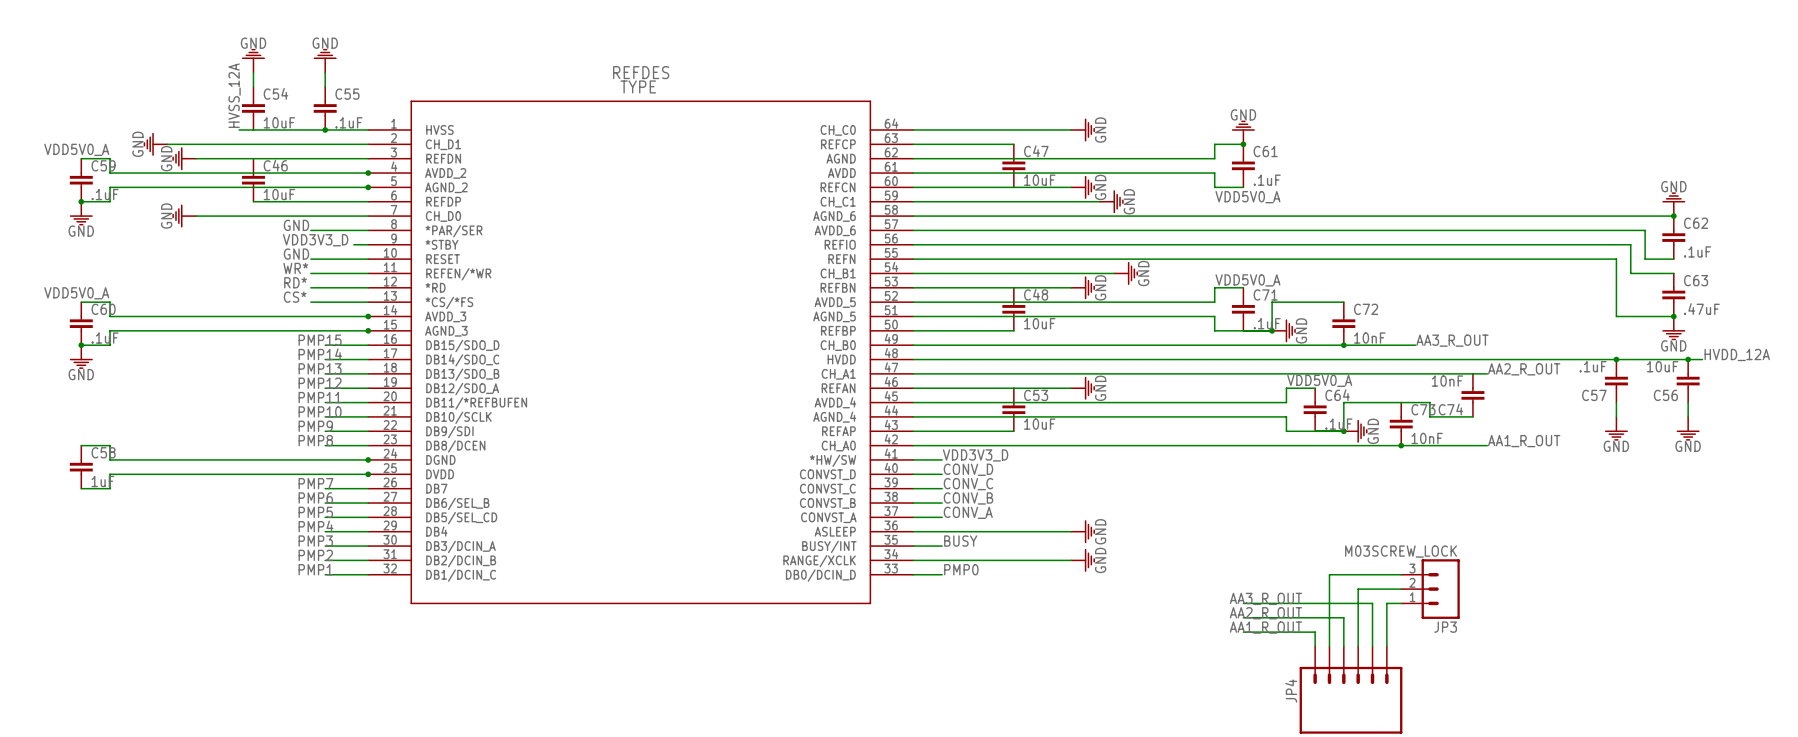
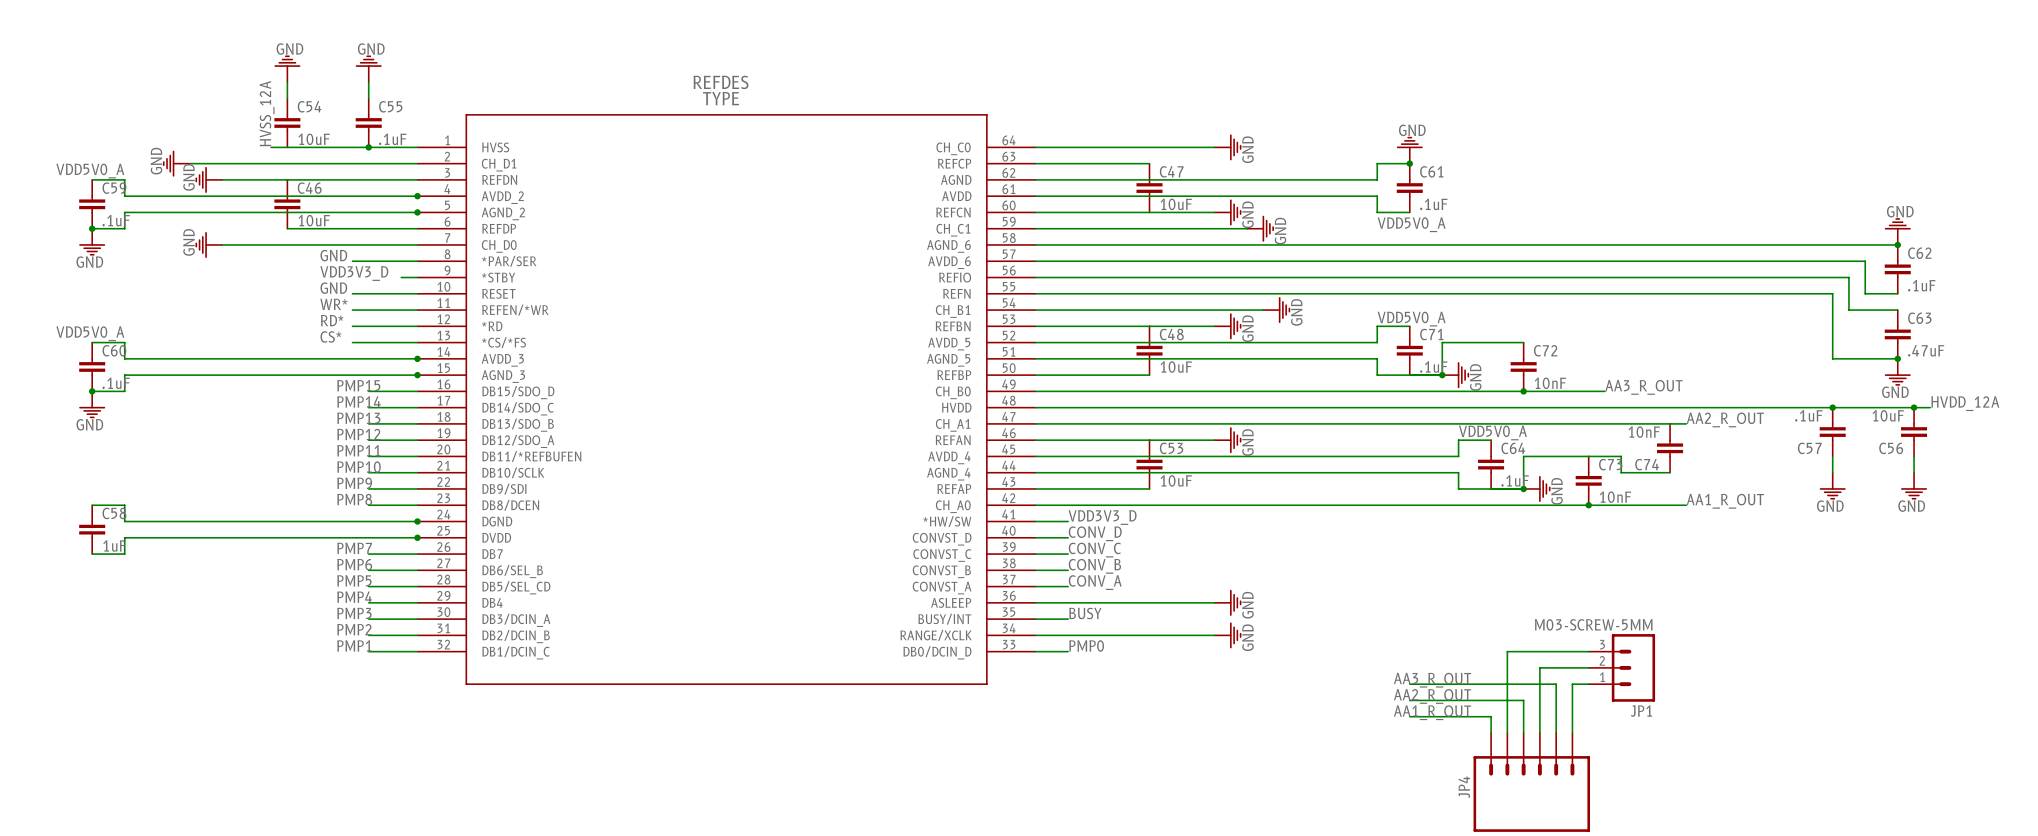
JP3 value: M03SCREW_LOCK (1401, 551) -> M03-SCREW-5MM (1593, 624)
JP3 name: JP3 (1445, 627) -> JP1 (1641, 711)

